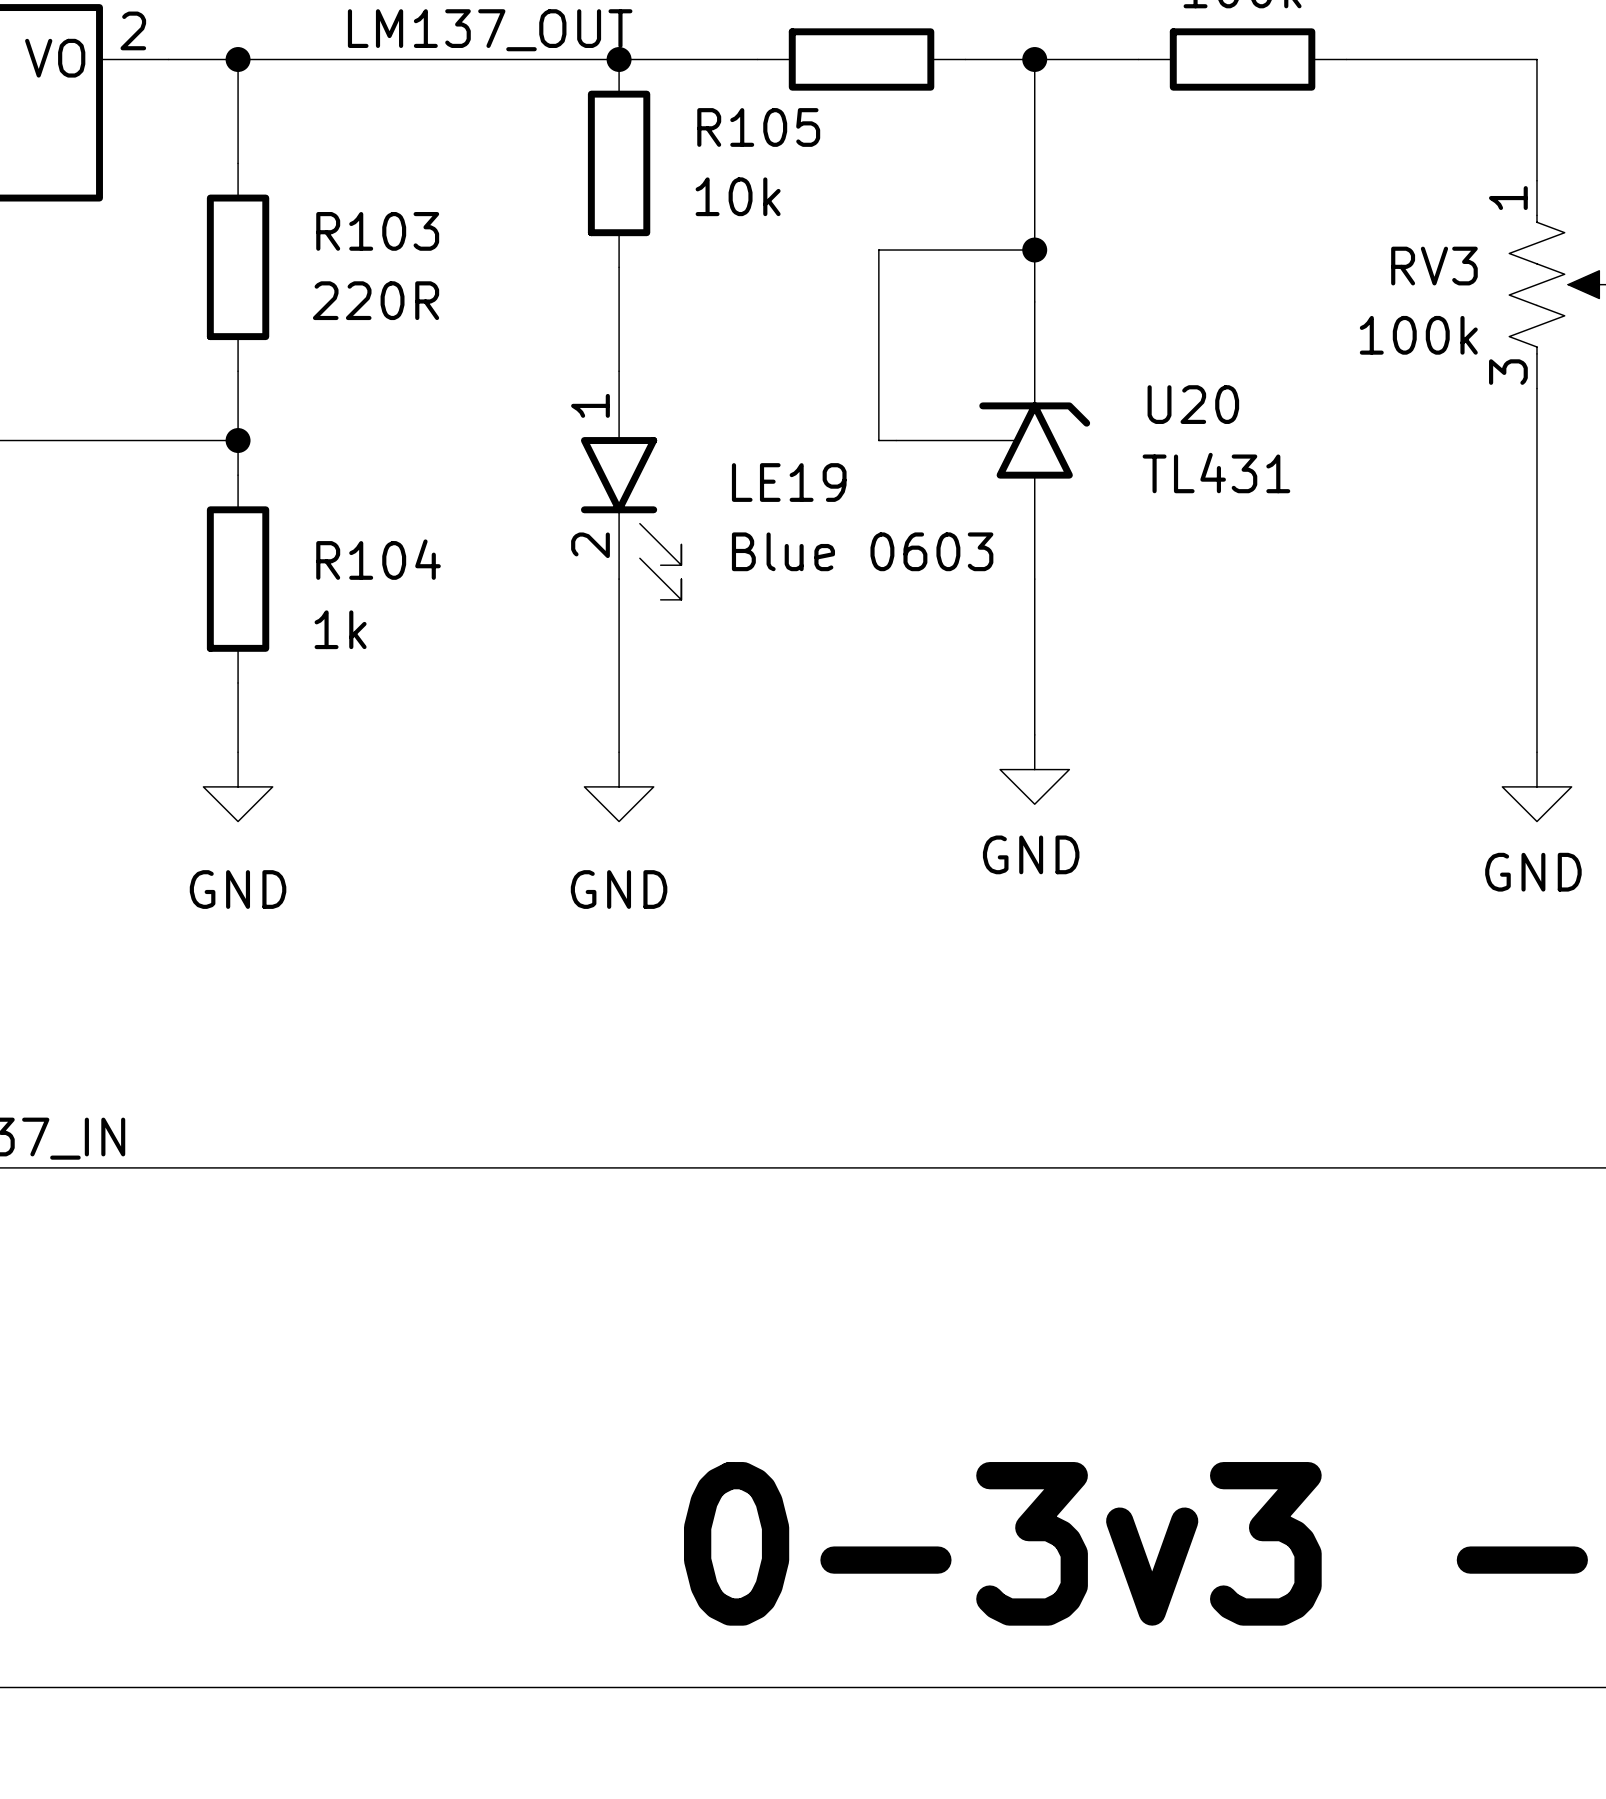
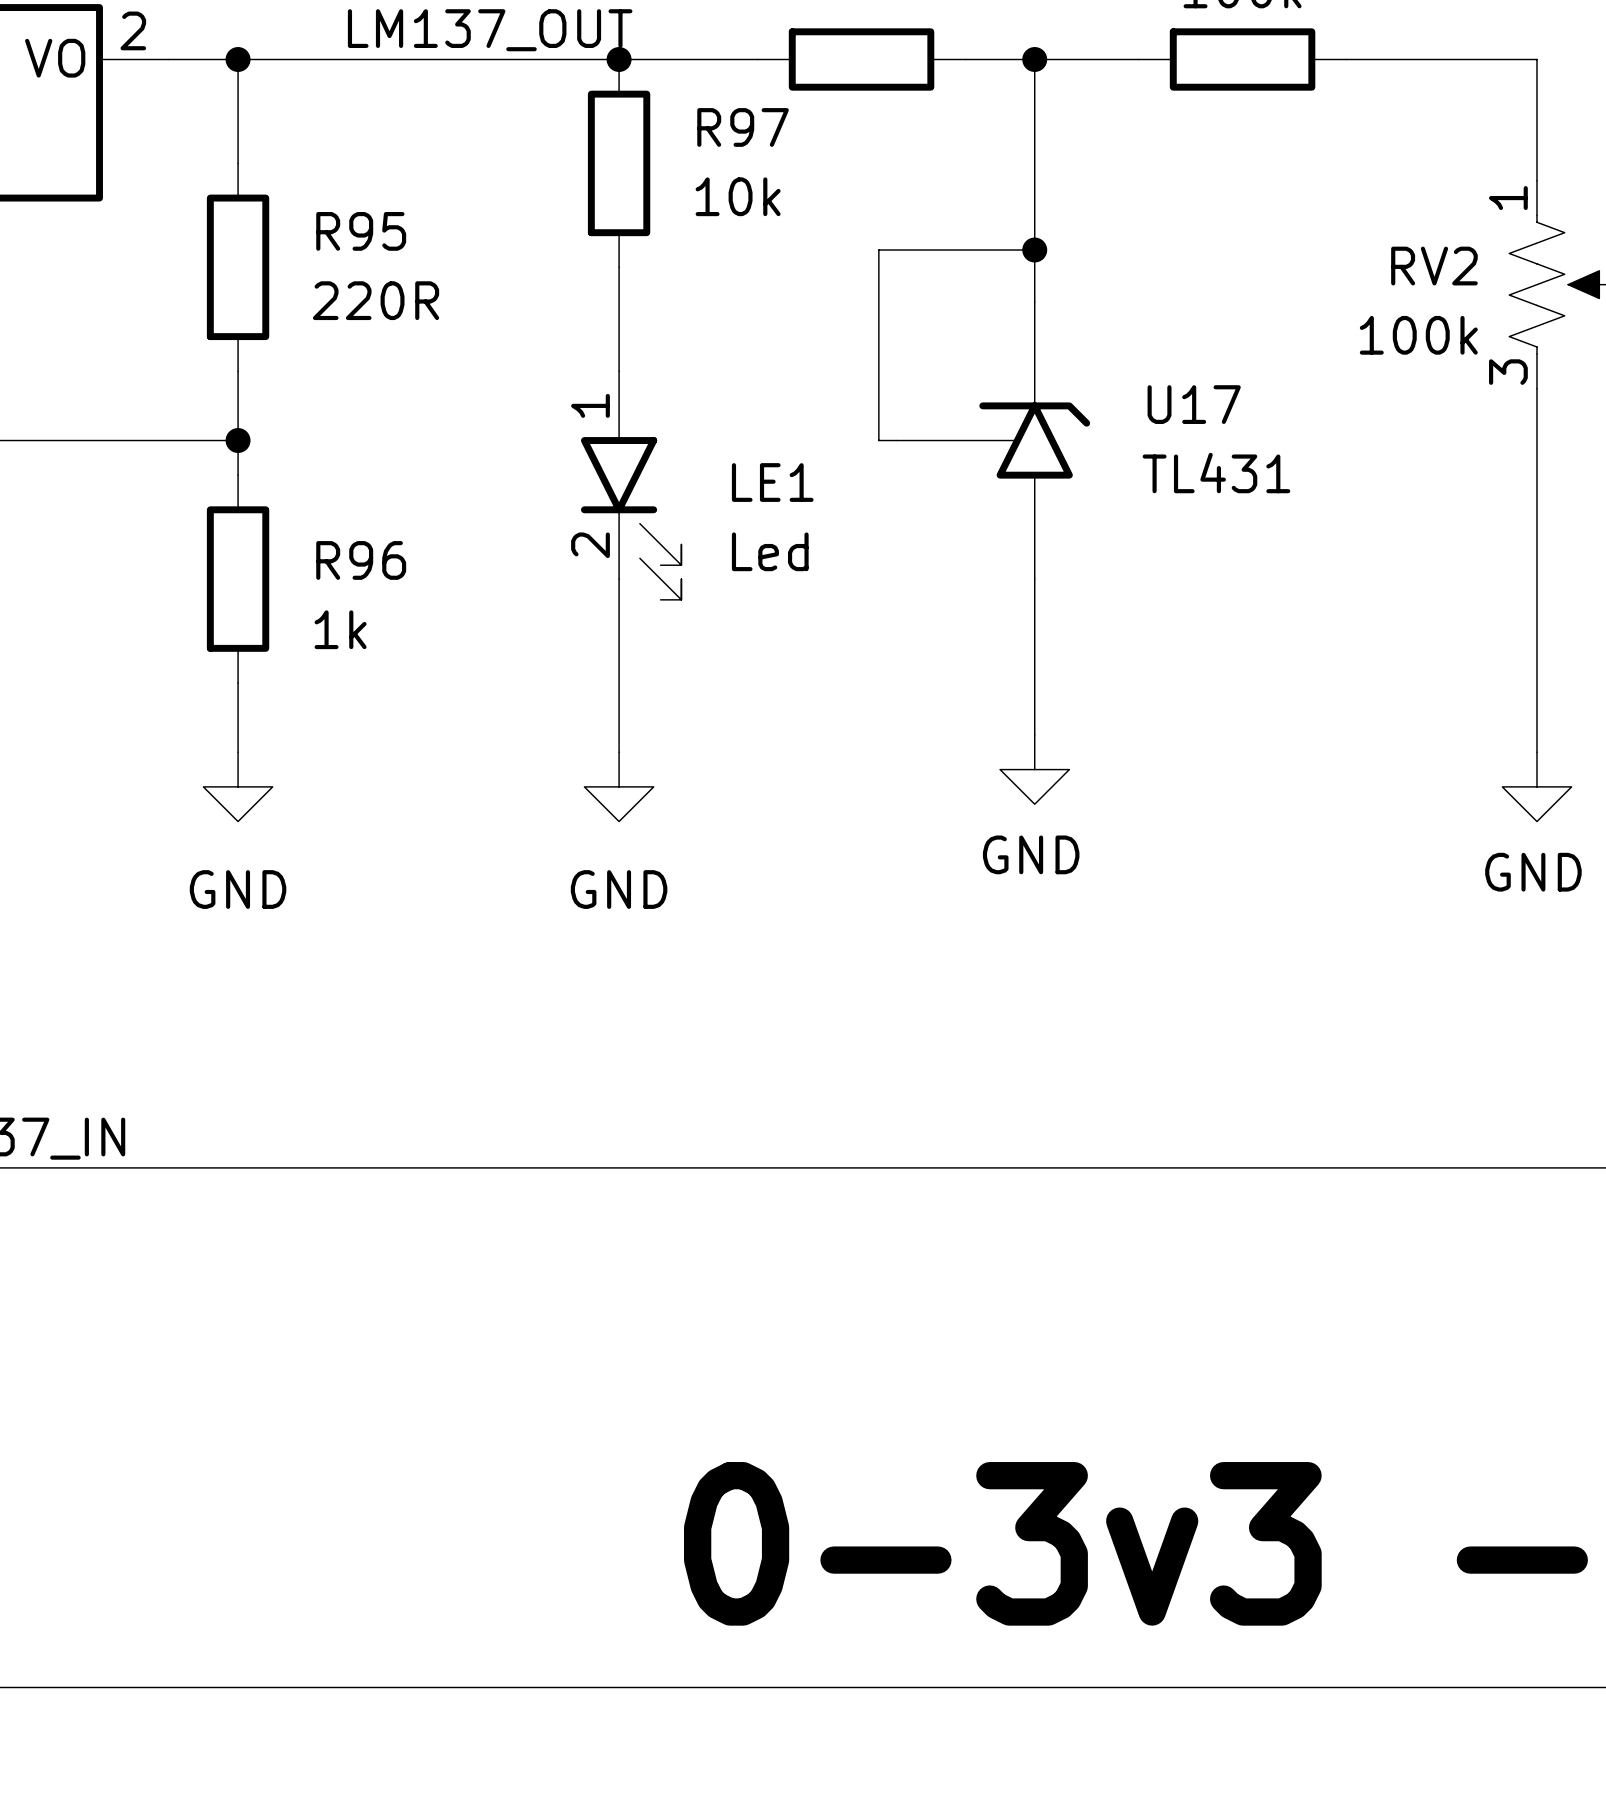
R105 name: R105 (758, 127) -> R97 (743, 127)
R103 name: R103 (377, 231) -> R95 (361, 231)
RV3 name: RV3 (1434, 266) -> RV2 (1434, 266)
U20 name: U20 (1193, 404) -> U17 (1194, 404)
LE19 name: LE19 (789, 482) -> LE1 (772, 482)
LE19 value: Blue 0603 (862, 551) -> Led (770, 551)
R104 name: R104 (378, 559) -> R96 (361, 560)

